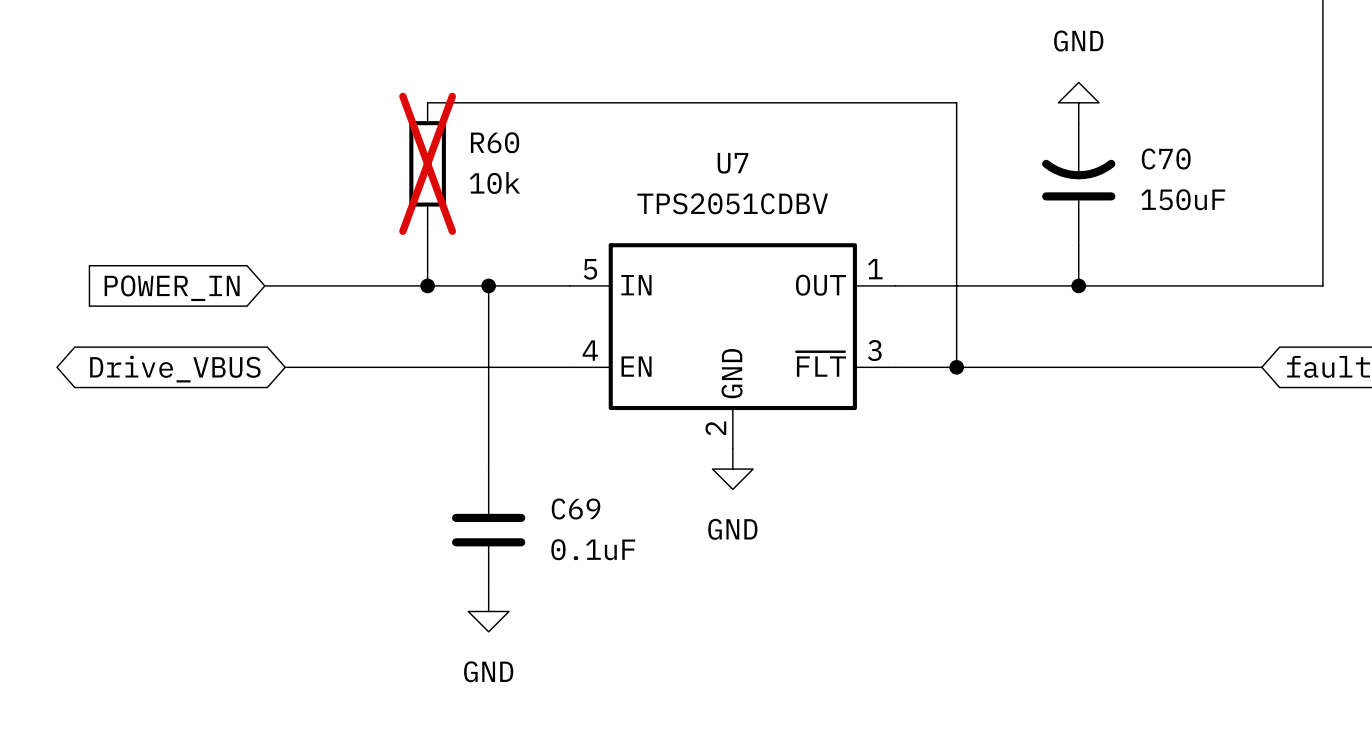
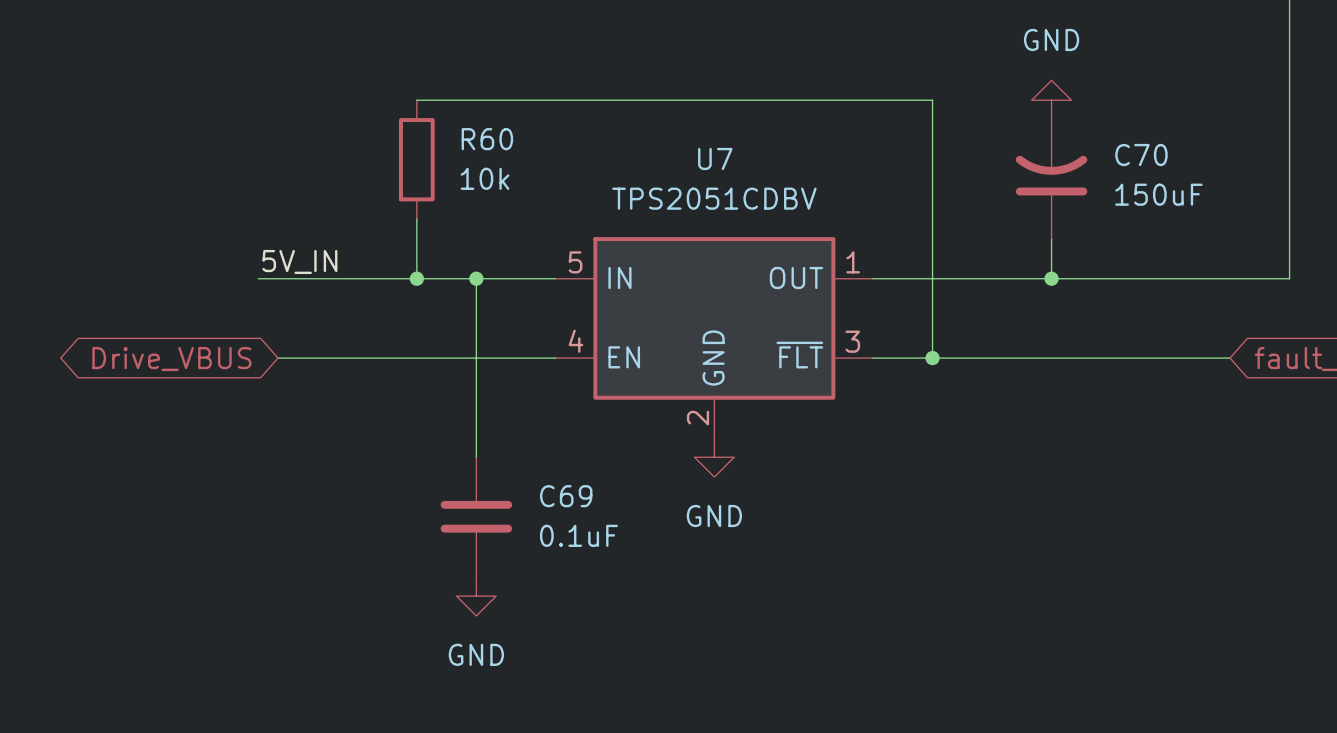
R60 do-not-place cross: (427, 163) -> none
label: none -> 5V_IN (299, 261)
global label: POWER_IN (172, 288) -> none

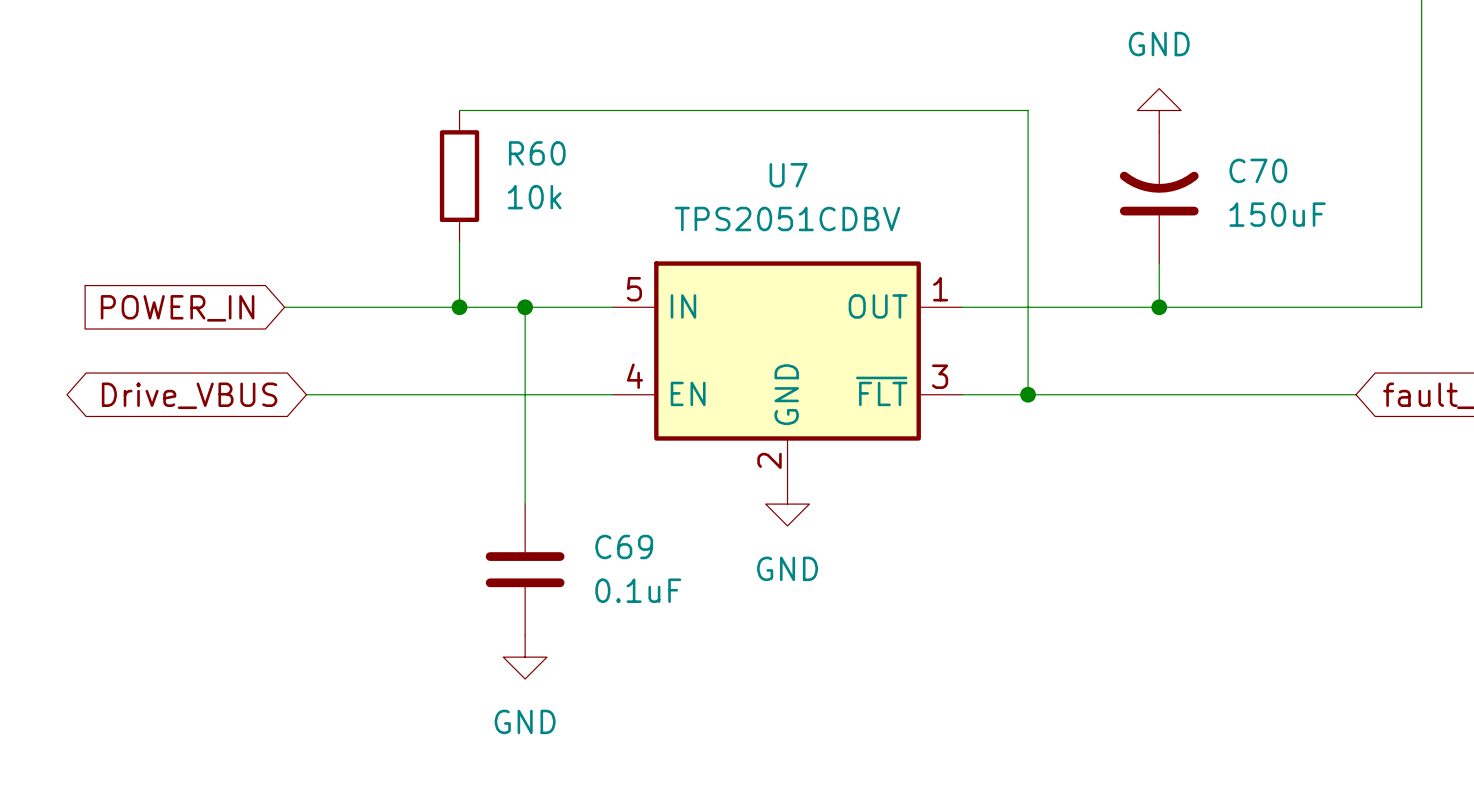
label: 5V_IN (299, 261) -> none
global label: none -> POWER_IN (177, 308)

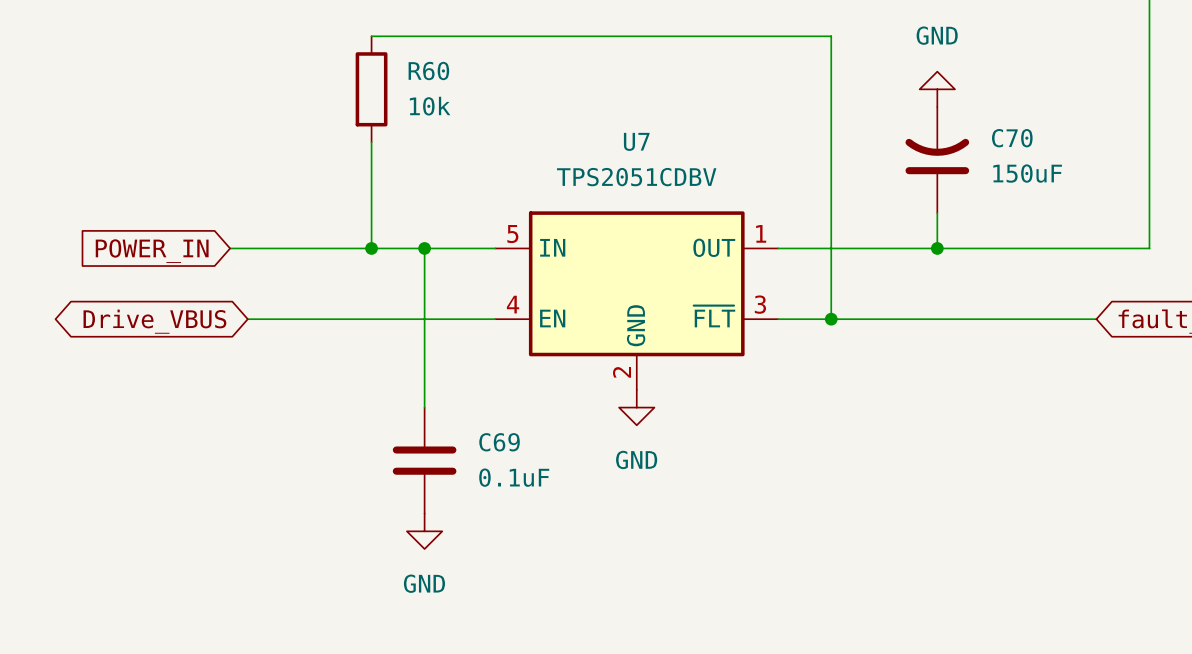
wire: (459, 110) (1028, 110) -> (371, 36) (831, 36) (831, 89)
wire: none -> (371, 142) (371, 195)
R60 position: (459, 176) -> (371, 89)

